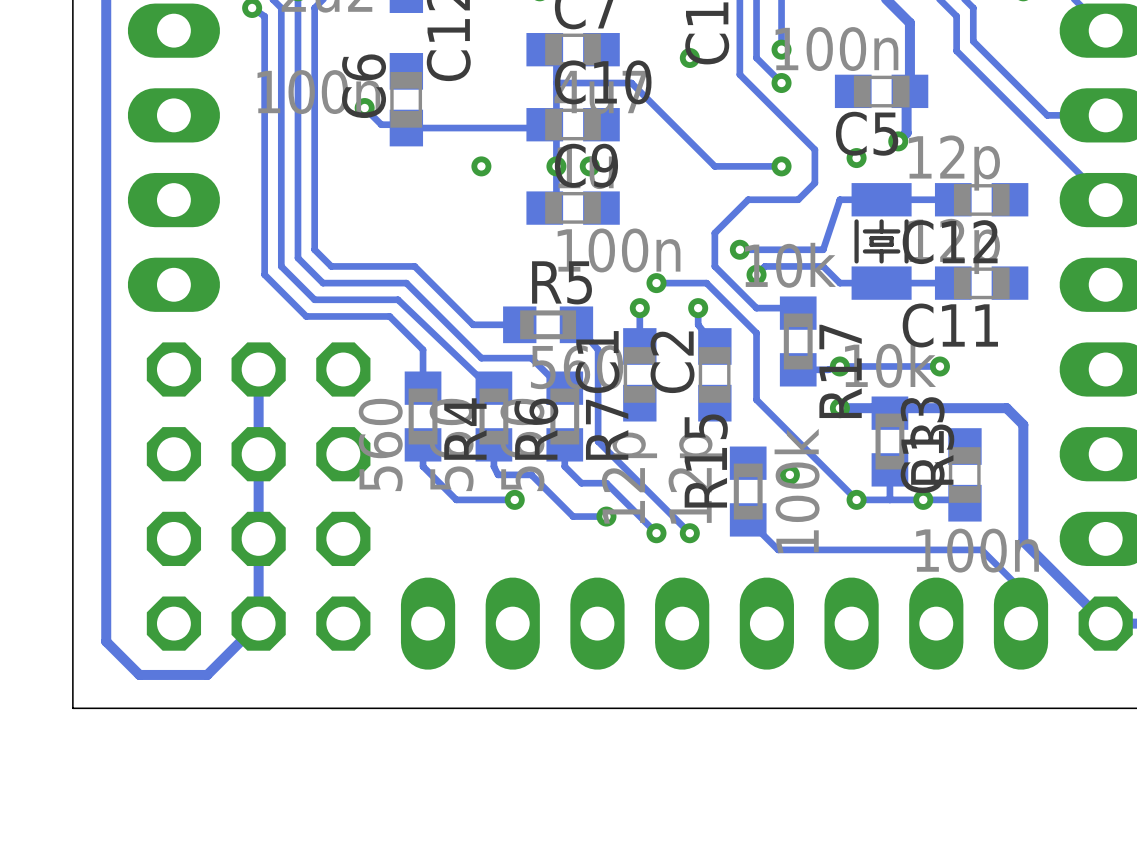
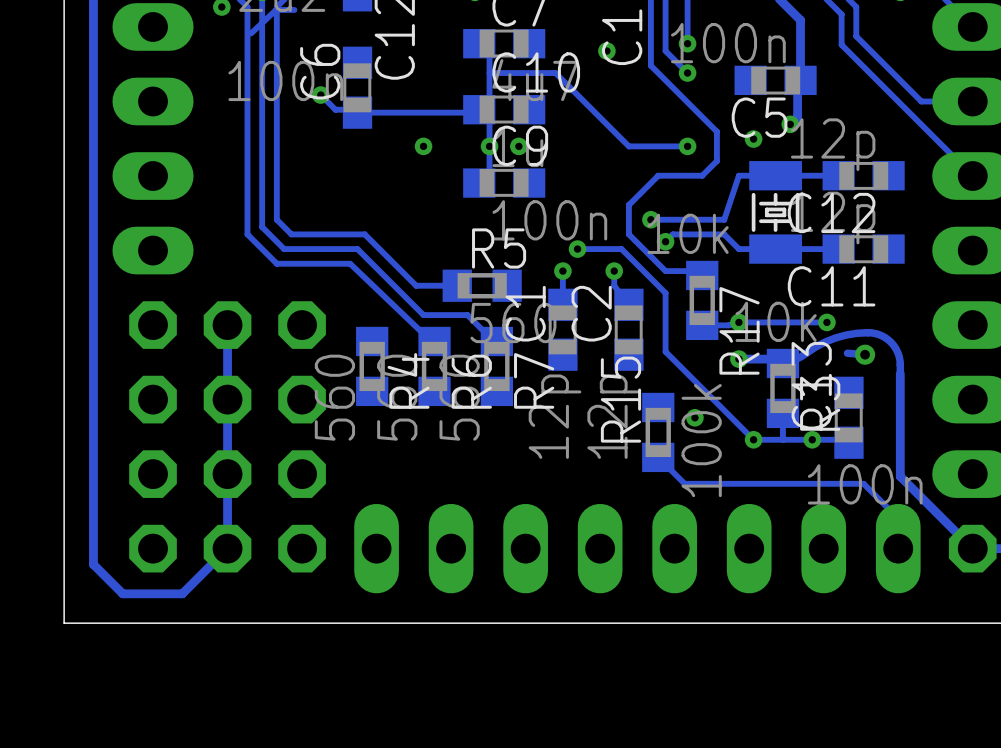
track: (252, 7) (264, 16) (264, 274) (306, 316) (389, 316) (423, 349) (423, 388) -> none
track: none -> (294, 9) (276, 9) (251, 33)
track: (576, 324) (598, 349) (598, 441) (689, 533) -> none
track: none -> (847, 353) (865, 354)
via: none -> (865, 354)
track: (873, 408) (1006, 408) (1023, 424) -> (782, 363) (795, 359) (835, 337) (857, 333) (872, 332) (884, 337) (893, 345) (899, 356) (900, 373)
track: (423, 444) (423, 466) (456, 499) (514, 499) -> none
track: (493, 444) (493, 466) (498, 474) (531, 474) (573, 516) (606, 516) -> none
track: (564, 444) (564, 466) (581, 483) (606, 483) (656, 533) -> none
via: (514, 499) -> none
via: (606, 516) -> none
via: (656, 533) -> none
via: (689, 533) -> none
part footprint: [400, 577, 1049, 670] -> [354, 503, 921, 594]

